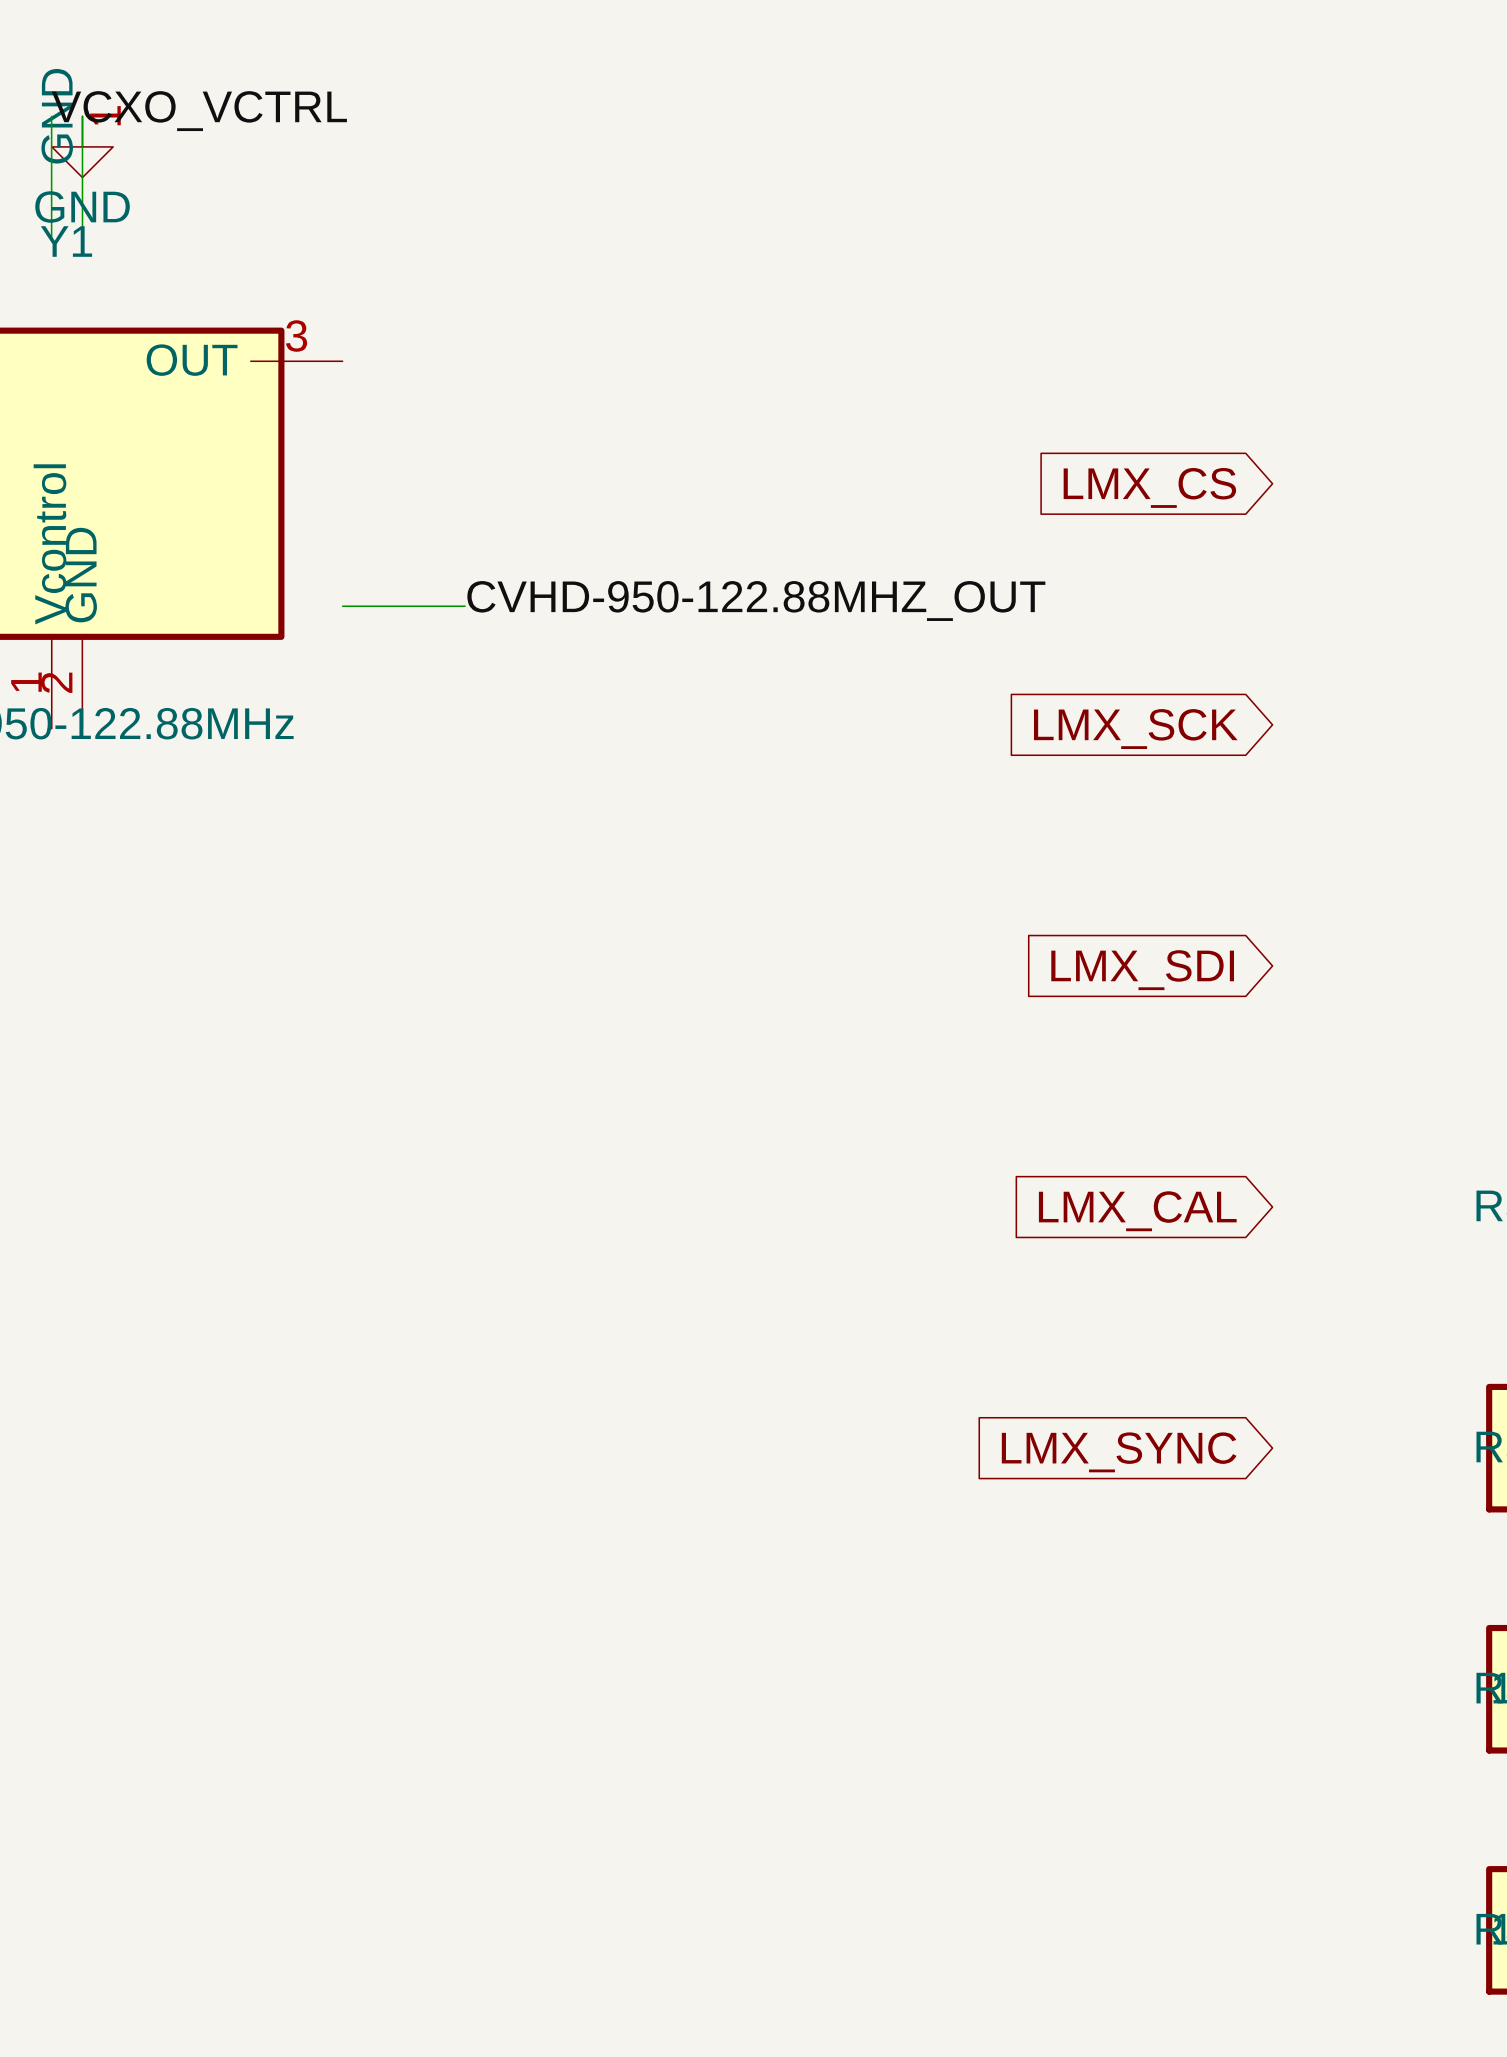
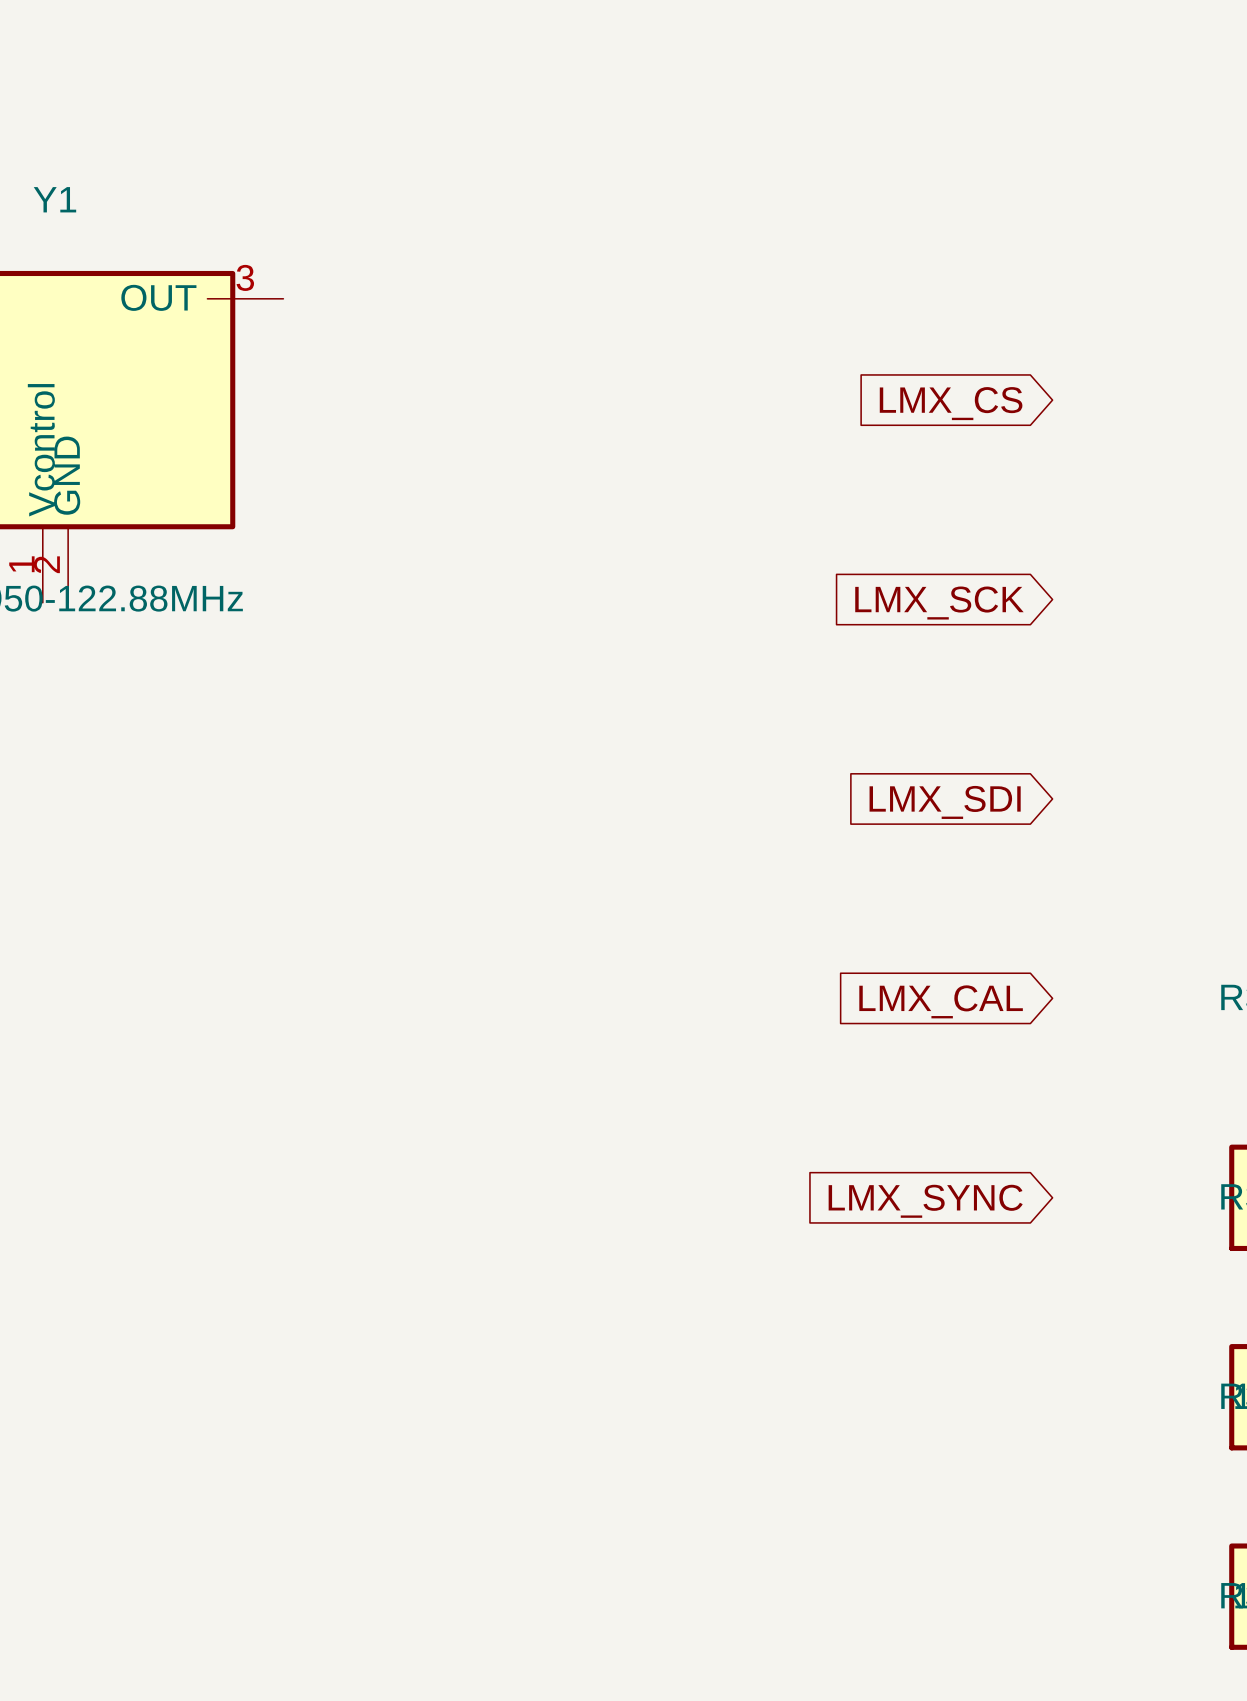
label: VCXO_VCTRL (199, 111) -> none
wire: (51, 116) (51, 238) -> none
wire: (82, 116) (82, 238) -> none
power symbol: GND (82, 146) -> none
label: CVHD-950-122.88MHZ_OUT (756, 601) -> none
wire: (342, 606) (465, 606) -> none

